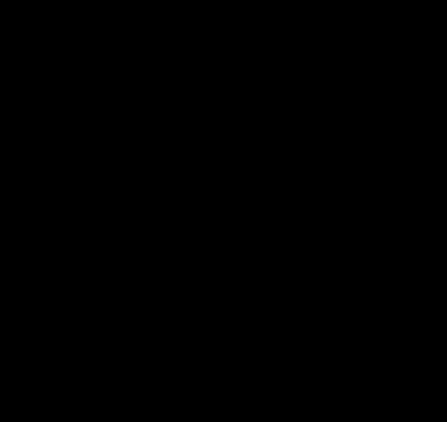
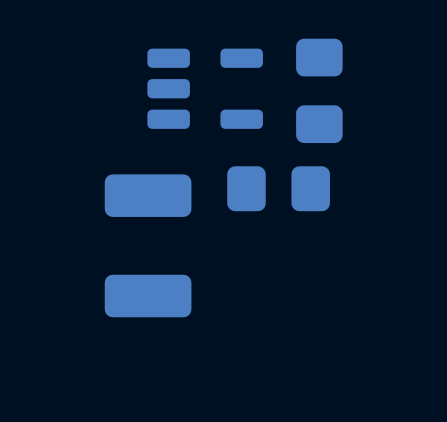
part: none -> (205, 88)
part: none -> (319, 90)
part: none -> (278, 188)
part: none -> (148, 245)

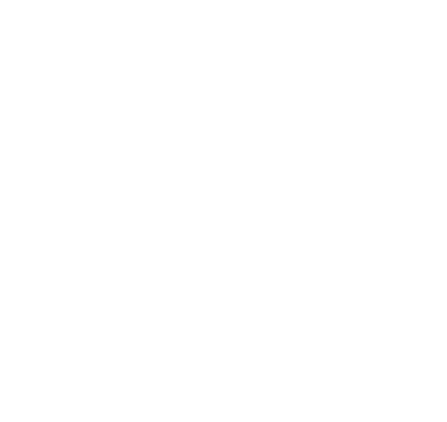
part: (205, 88) -> none
part: (319, 90) -> none
part: (278, 188) -> none
part: (148, 245) -> none

